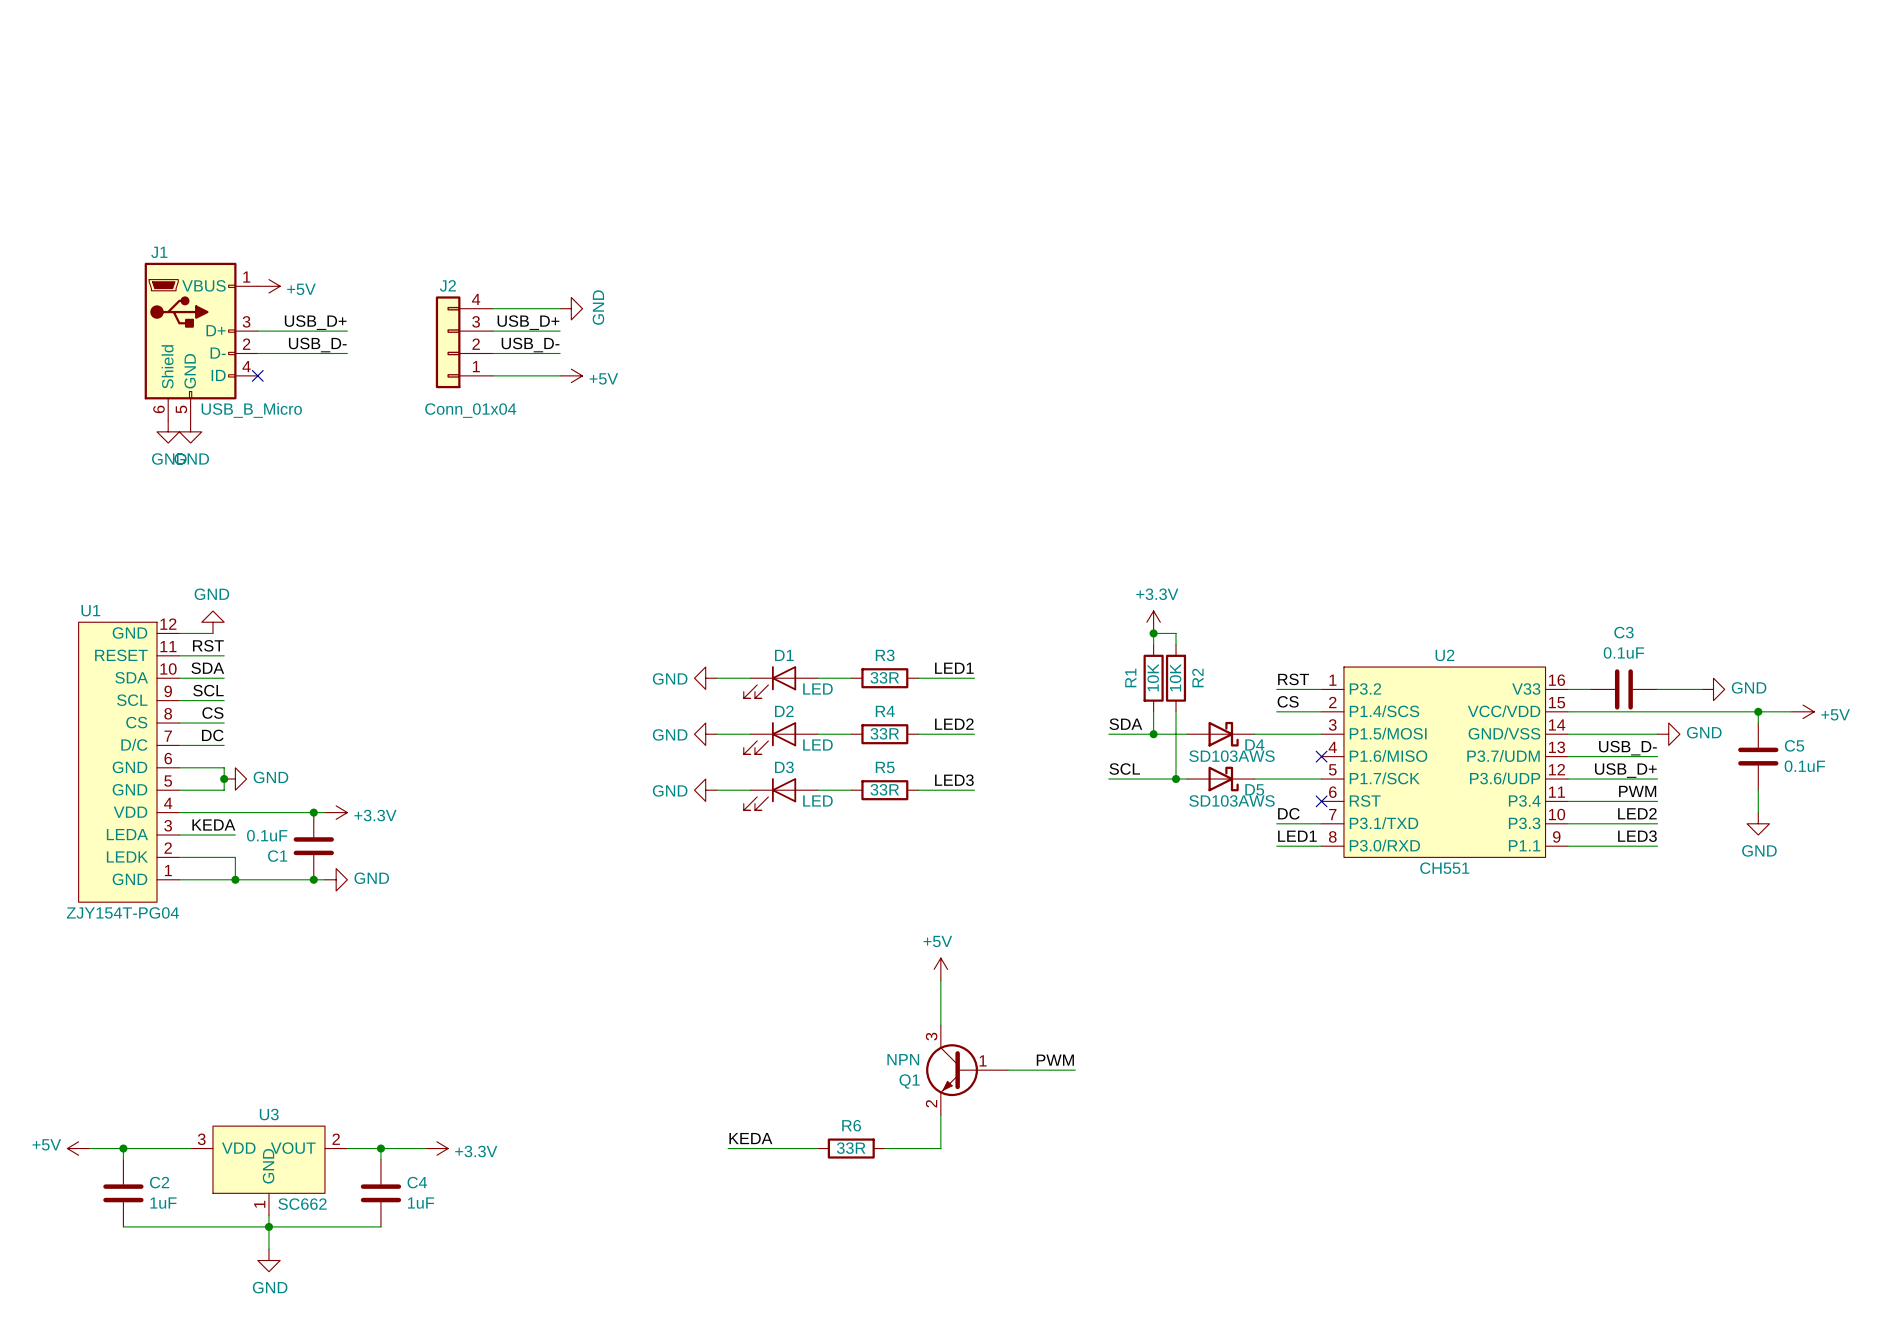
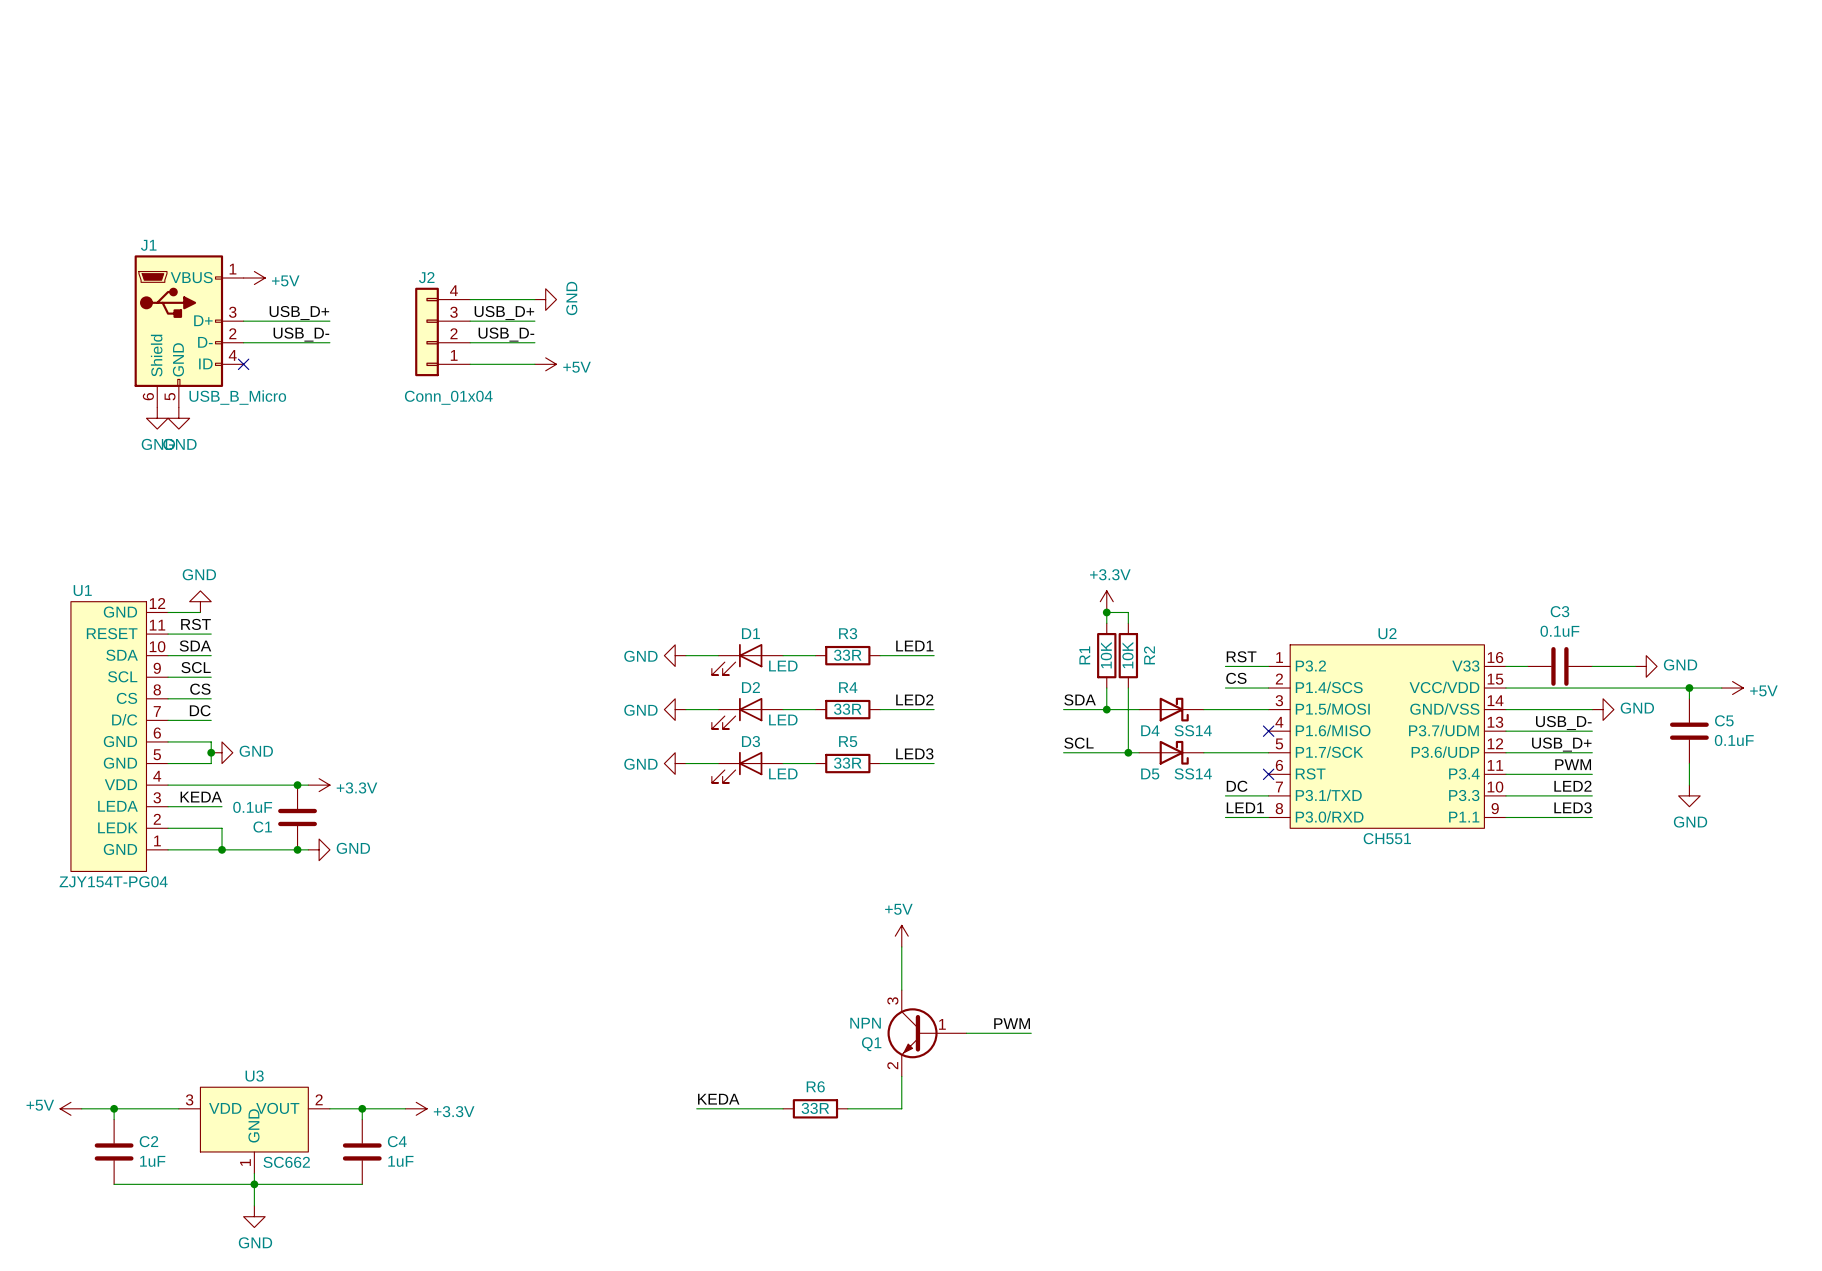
D4 name position: D4 (1254, 744) -> D4 (1150, 730)
D4 value: SD103AWS (1231, 756) -> SS14 (1193, 730)
D5 name position: D5 (1254, 789) -> D5 (1150, 774)
D5 value: SD103AWS (1231, 800) -> SS14 (1193, 773)

